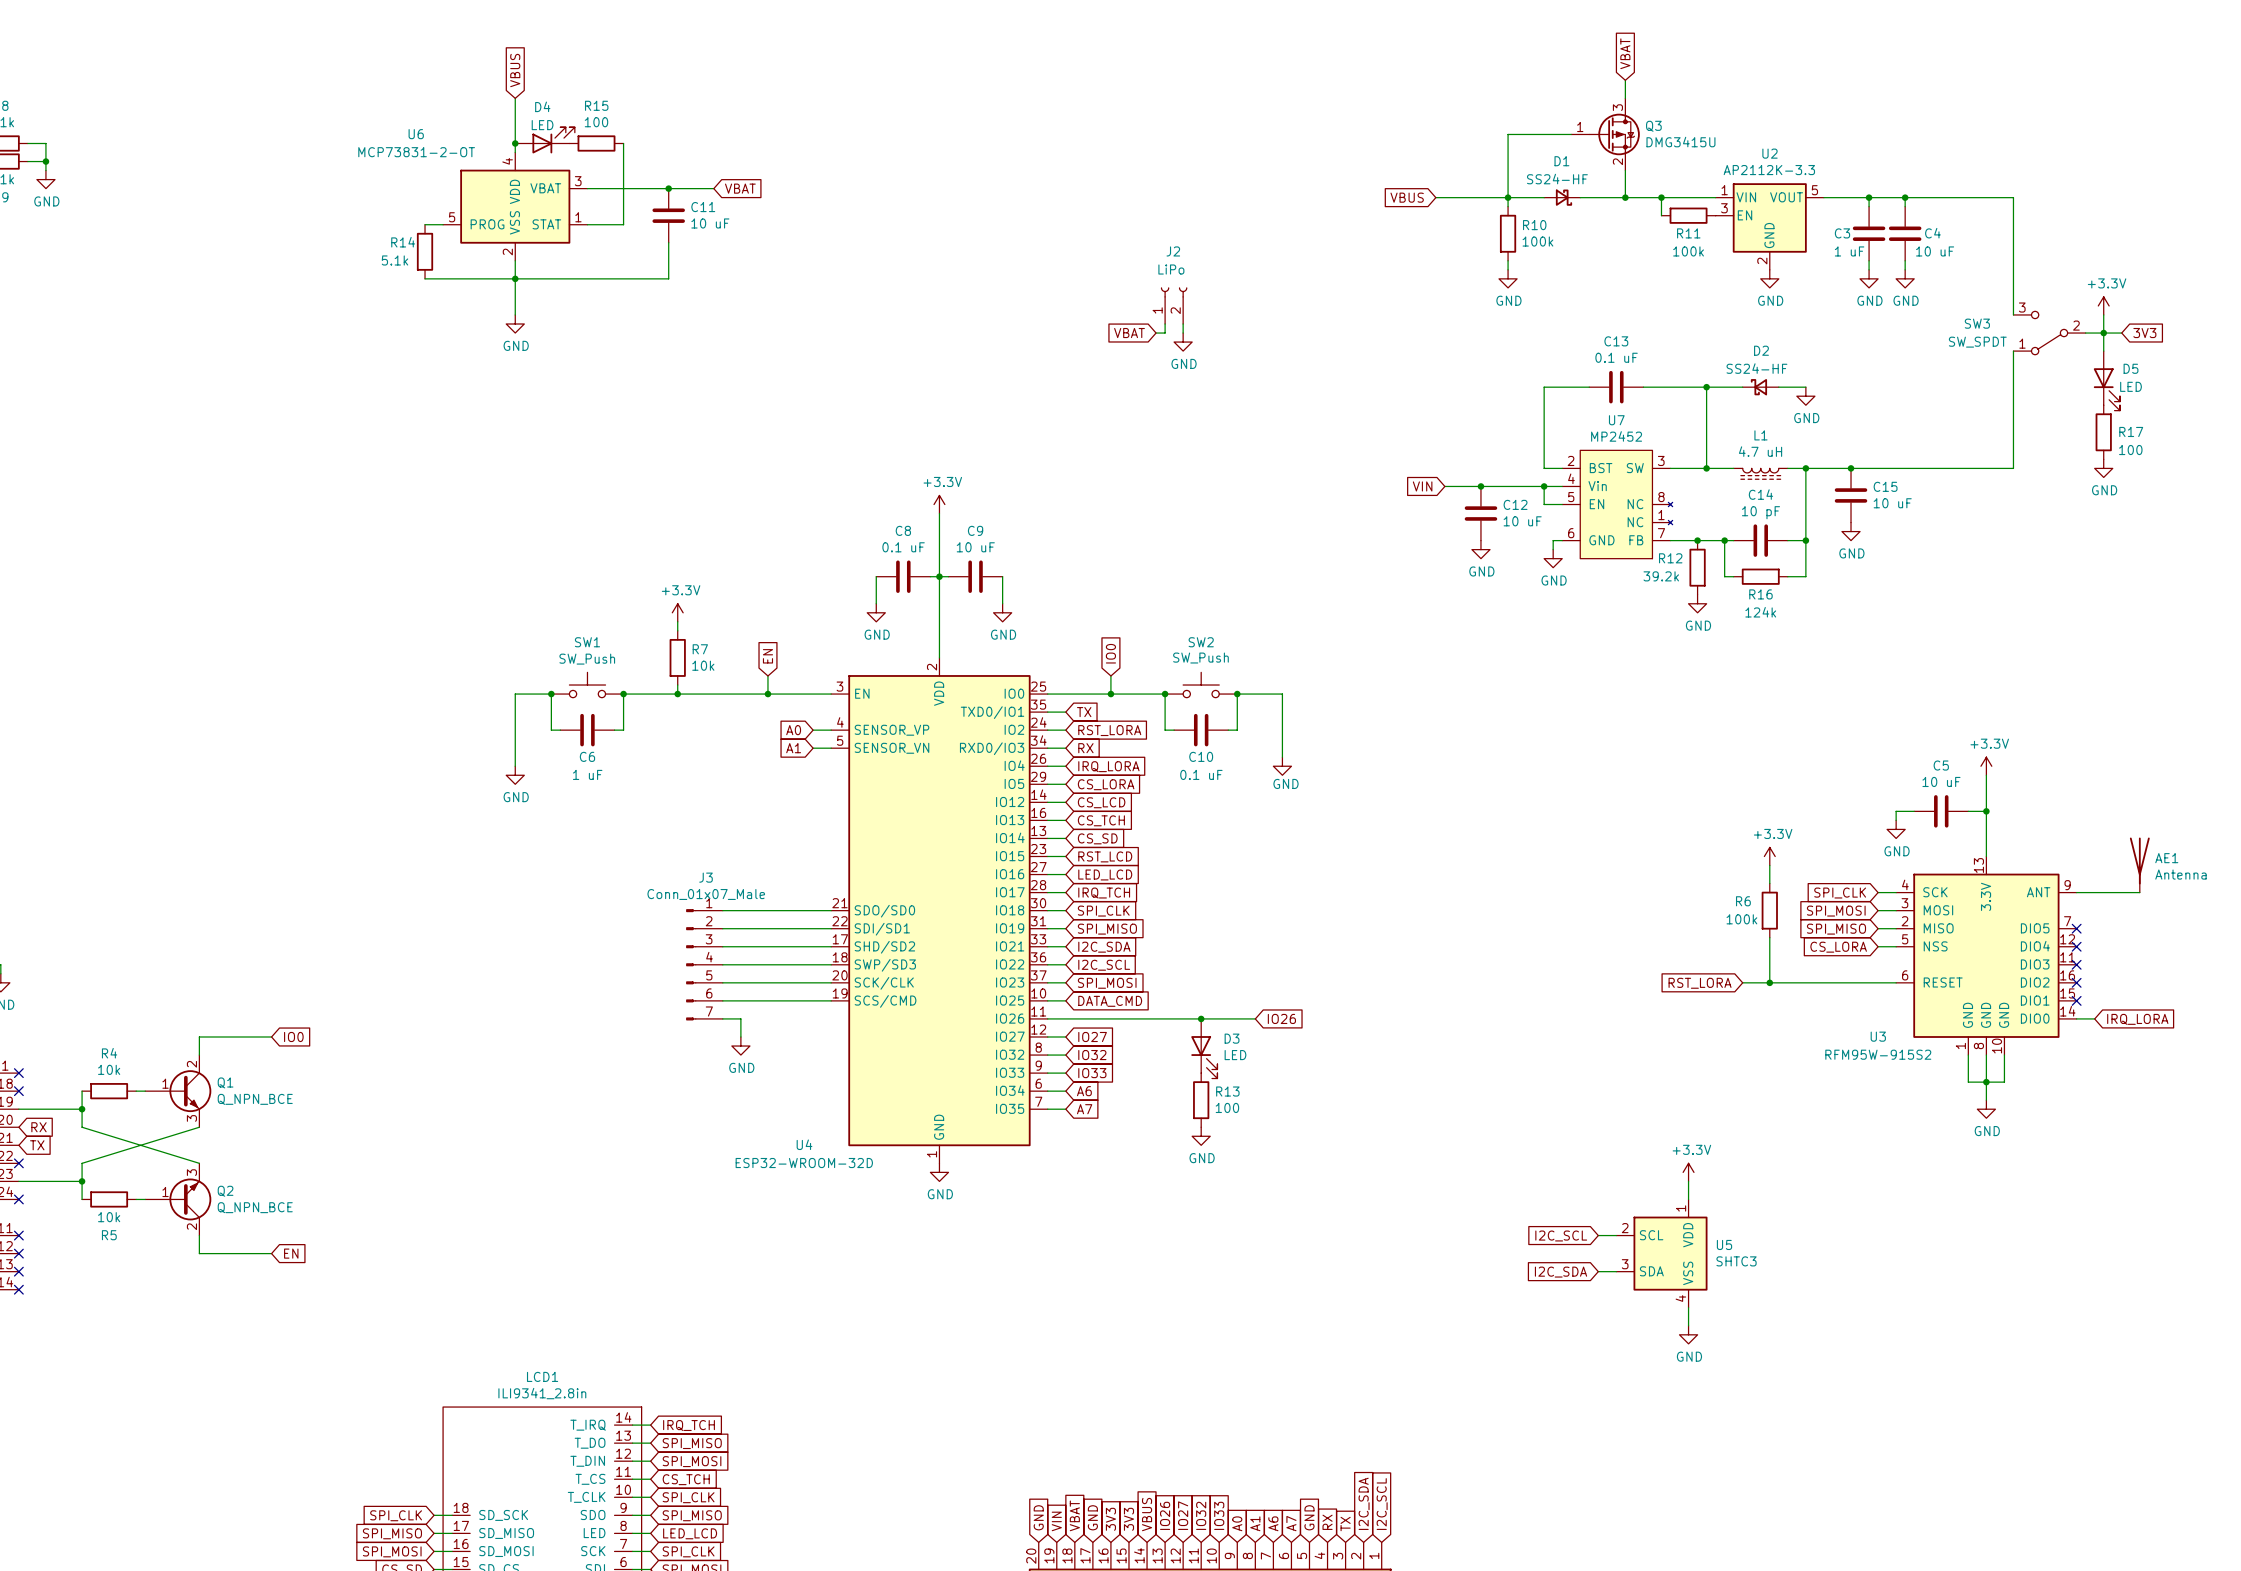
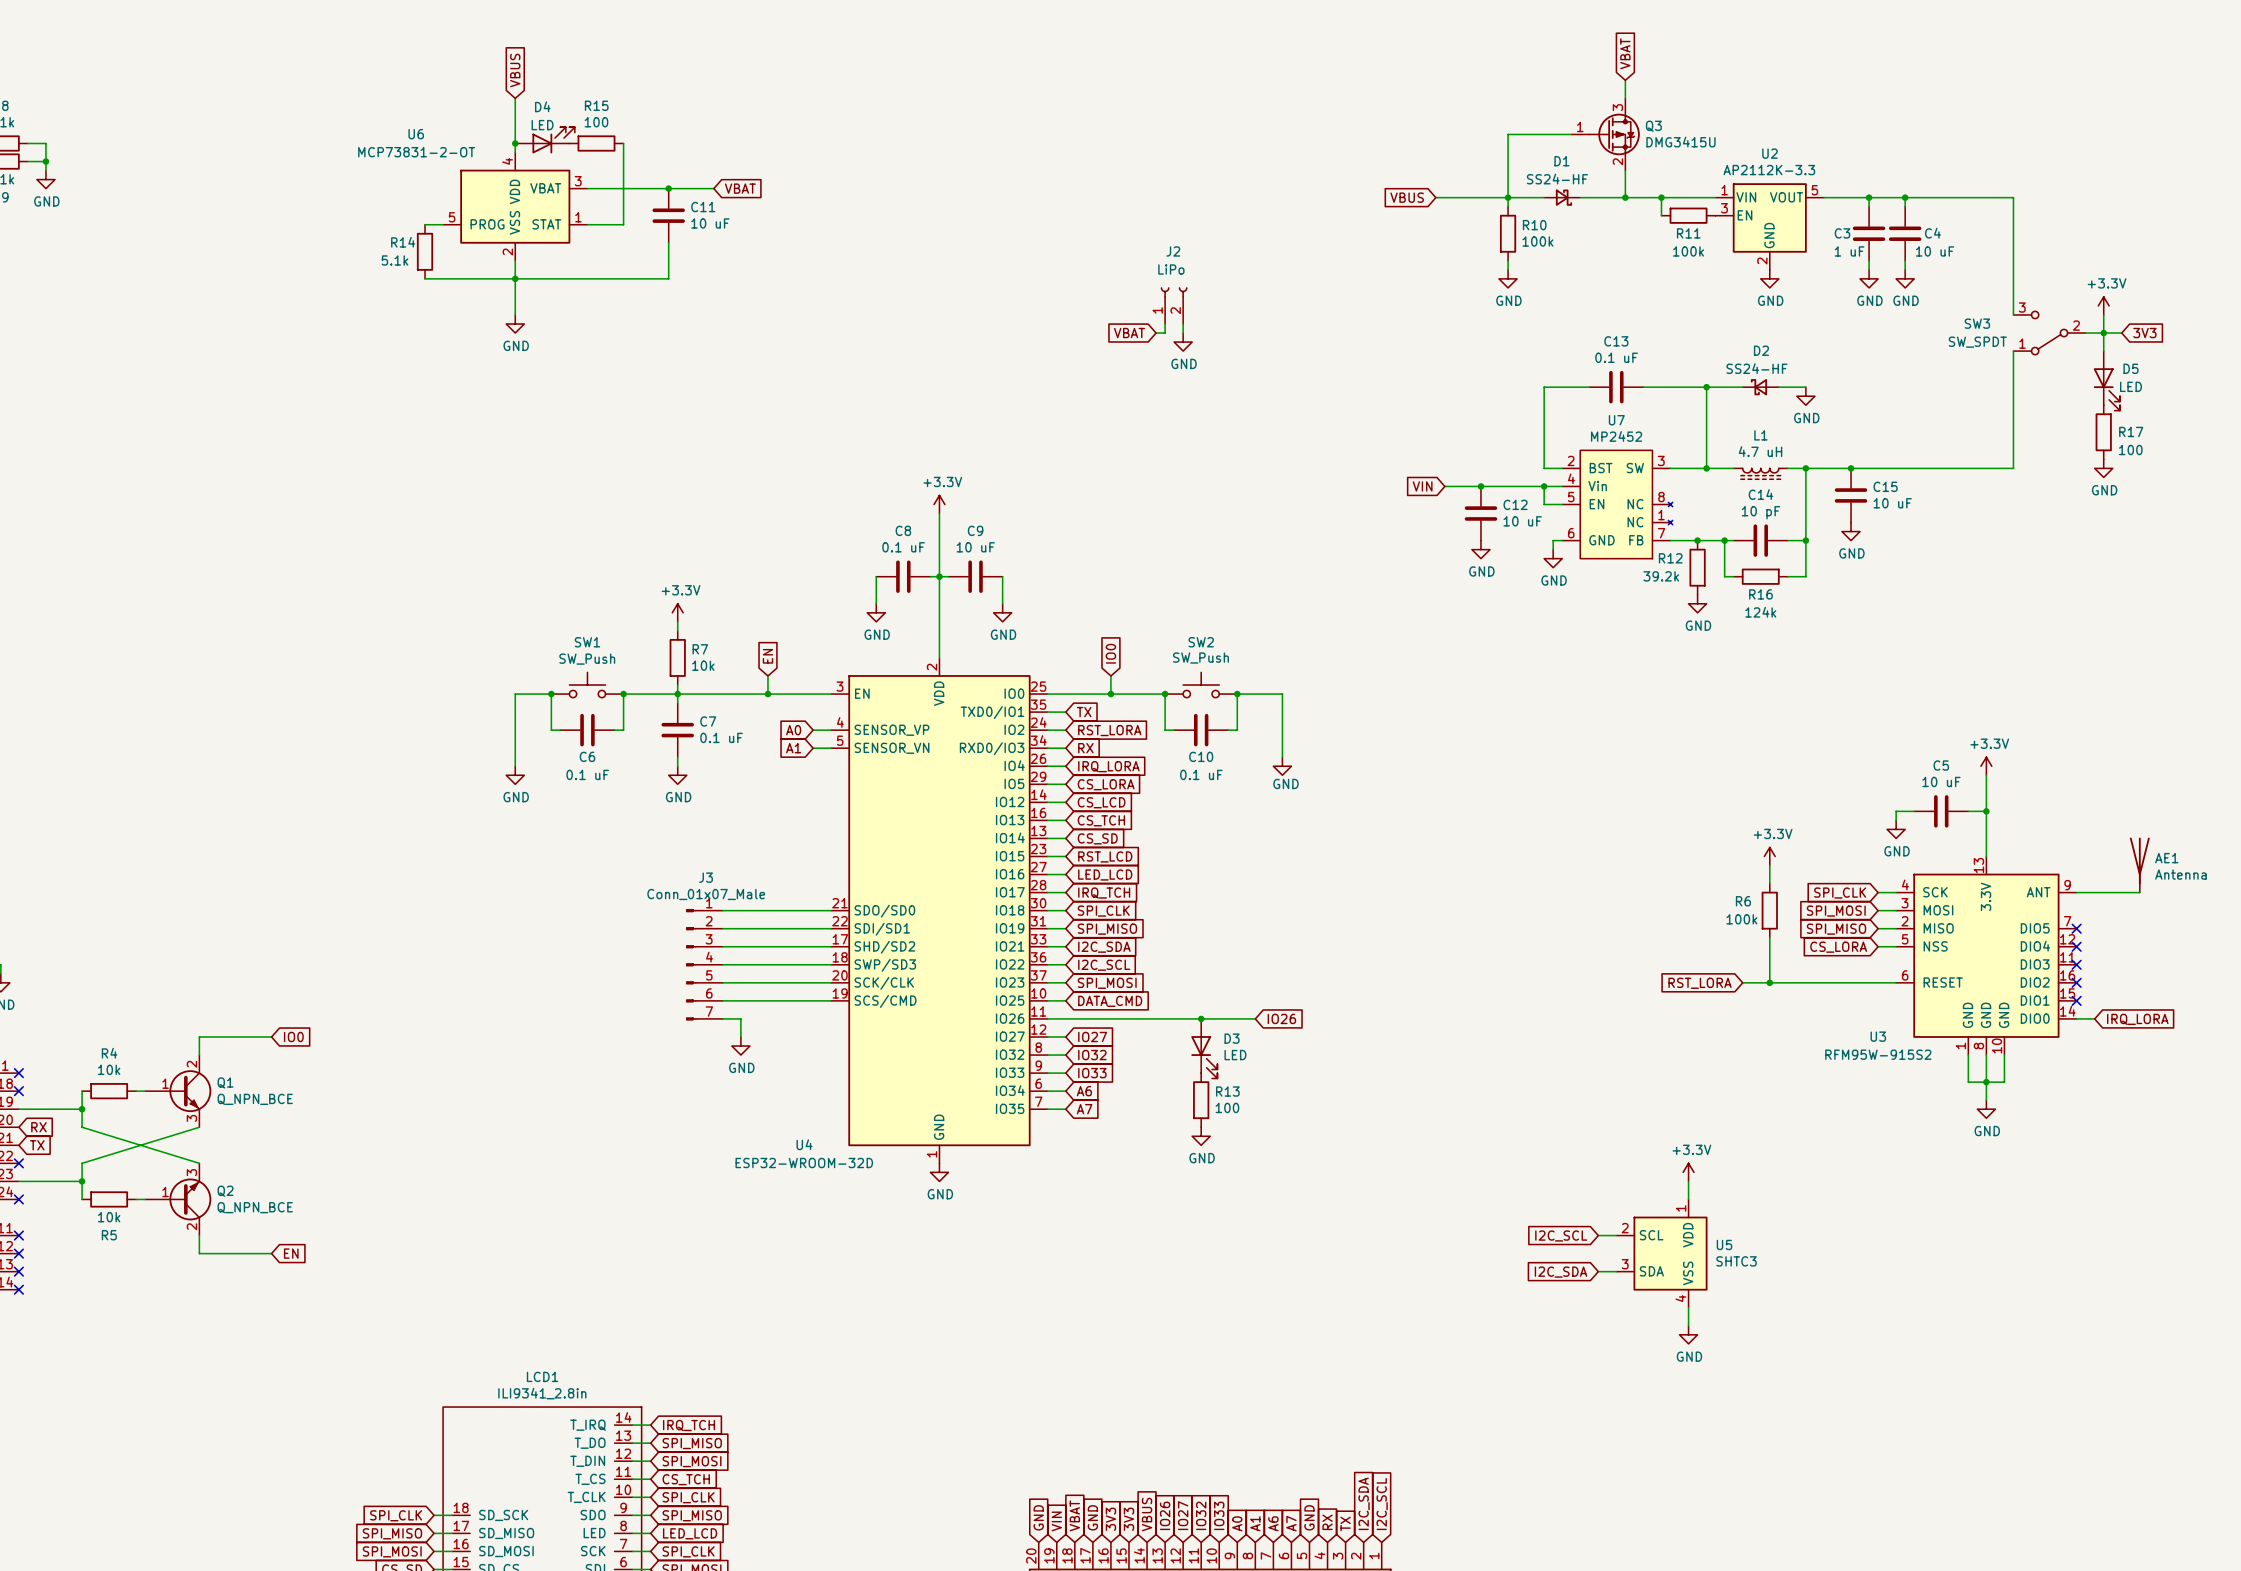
wire: none -> (677, 694) (677, 703)
C7: none -> 0.1 uF (677, 730)
wire: none -> (677, 757) (677, 766)
C6 value: 1 uF (587, 774) -> 0.1 uF (587, 774)
power symbol: none -> GND (677, 775)

